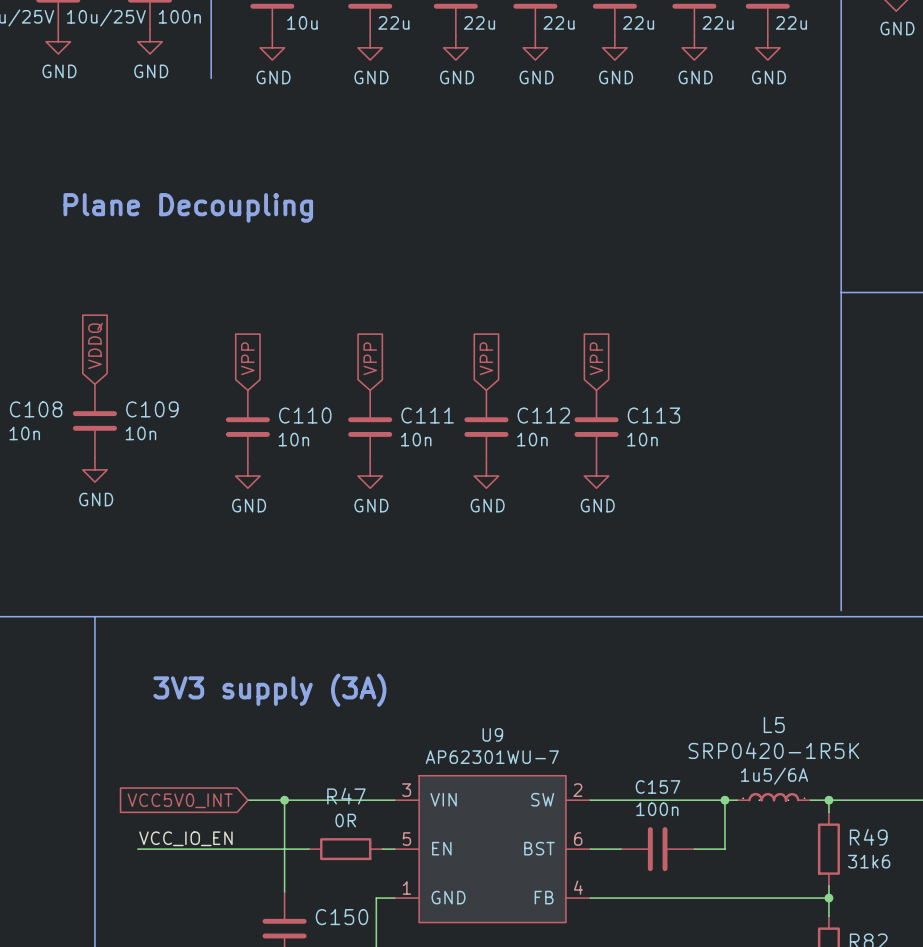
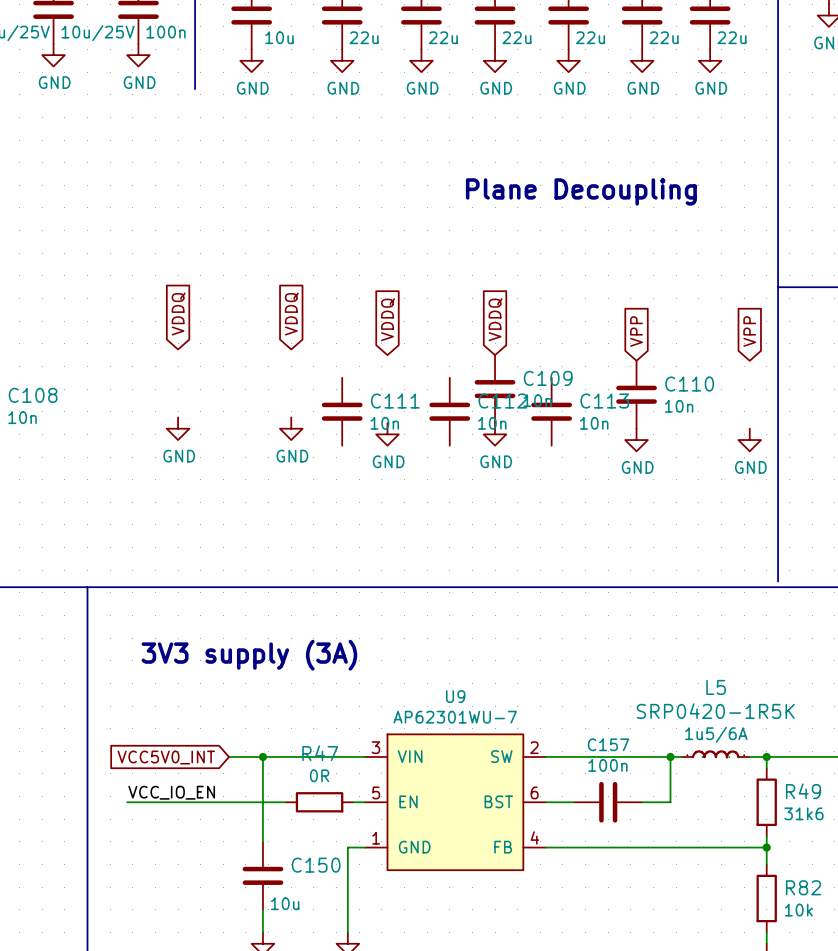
text: none -> Plane Decoupling (581, 191)
text: Plane Decoupling (188, 207) -> none
global label: none -> VDDQ (291, 314)
global label: none -> VDDQ (388, 319)
global label: none -> VDDQ (495, 319)
global label: none -> VPP (749, 331)
global label position: VDDQ (95, 345) -> VDDQ (178, 314)
global label: VPP (247, 358) -> none
global label: VPP (370, 358) -> none
global label: VPP (486, 358) -> none
global label position: VPP (596, 358) -> VPP (636, 331)
C109 position: (94, 420) -> (495, 389)
C110 position: (247, 427) -> (636, 394)
power symbol: none -> GND (178, 428)
power symbol: none -> GND (291, 428)
power symbol: none -> GND (387, 434)
power symbol: none -> GND (495, 434)
power symbol: none -> GND (636, 440)
power symbol: none -> GND (749, 440)
power symbol: GND (94, 469) -> none
power symbol: GND (247, 476) -> none
power symbol: GND (370, 476) -> none
power symbol: GND (486, 476) -> none
power symbol: GND (596, 476) -> none

